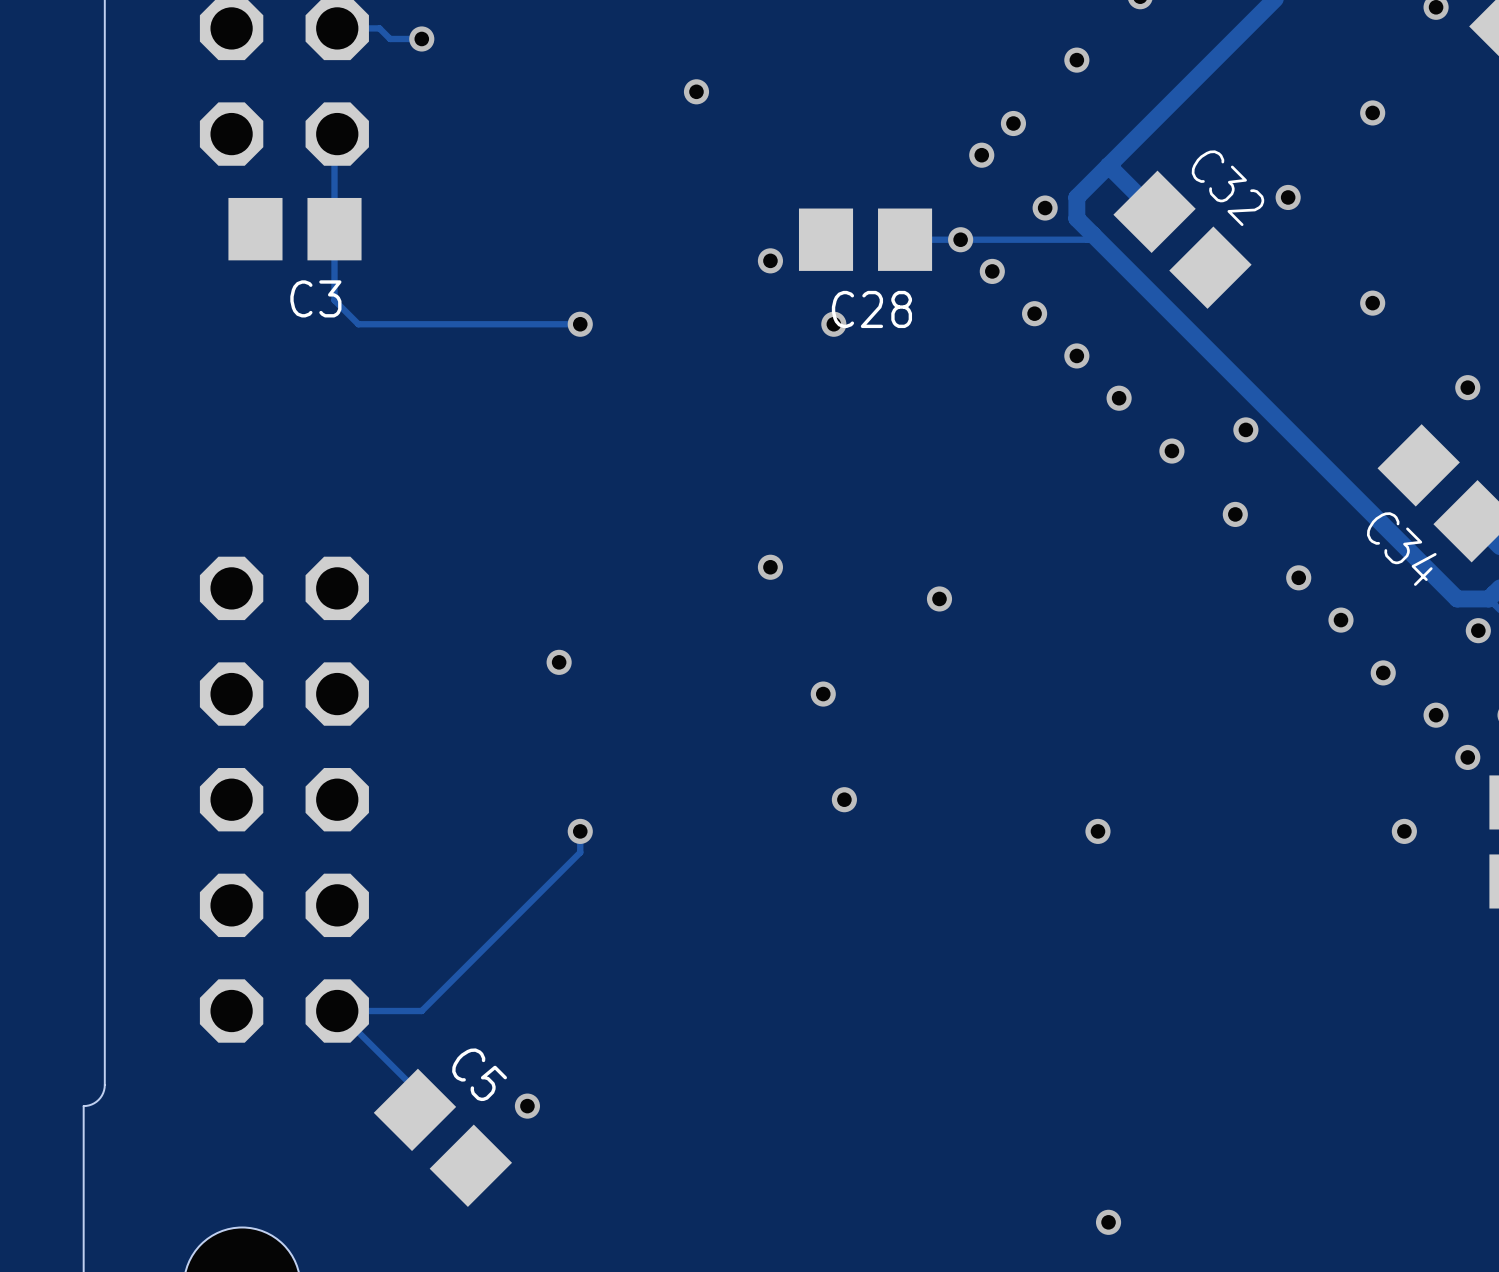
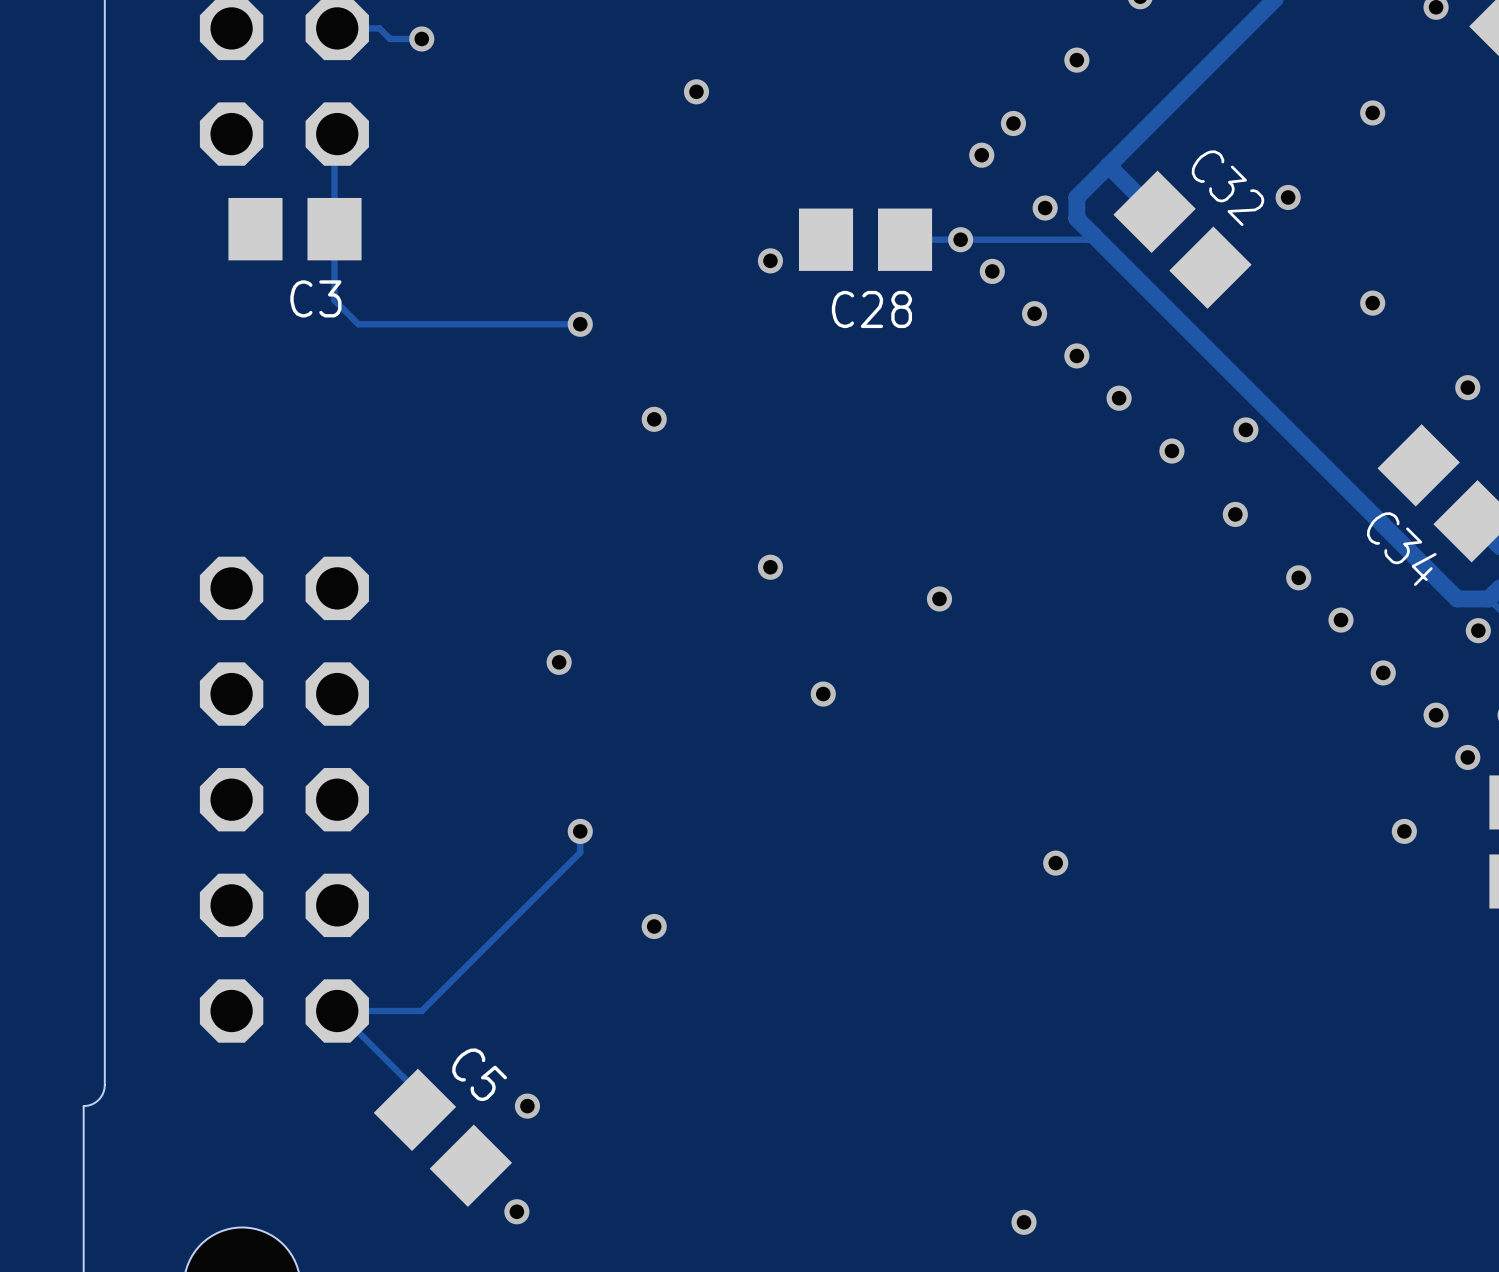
via position: (833, 324) -> (654, 419)
via: (844, 799) -> none
via position: (1097, 831) -> (1055, 863)
via: none -> (654, 926)
via: none -> (516, 1211)
via: none -> (1024, 1222)
via: (1108, 1222) -> none

